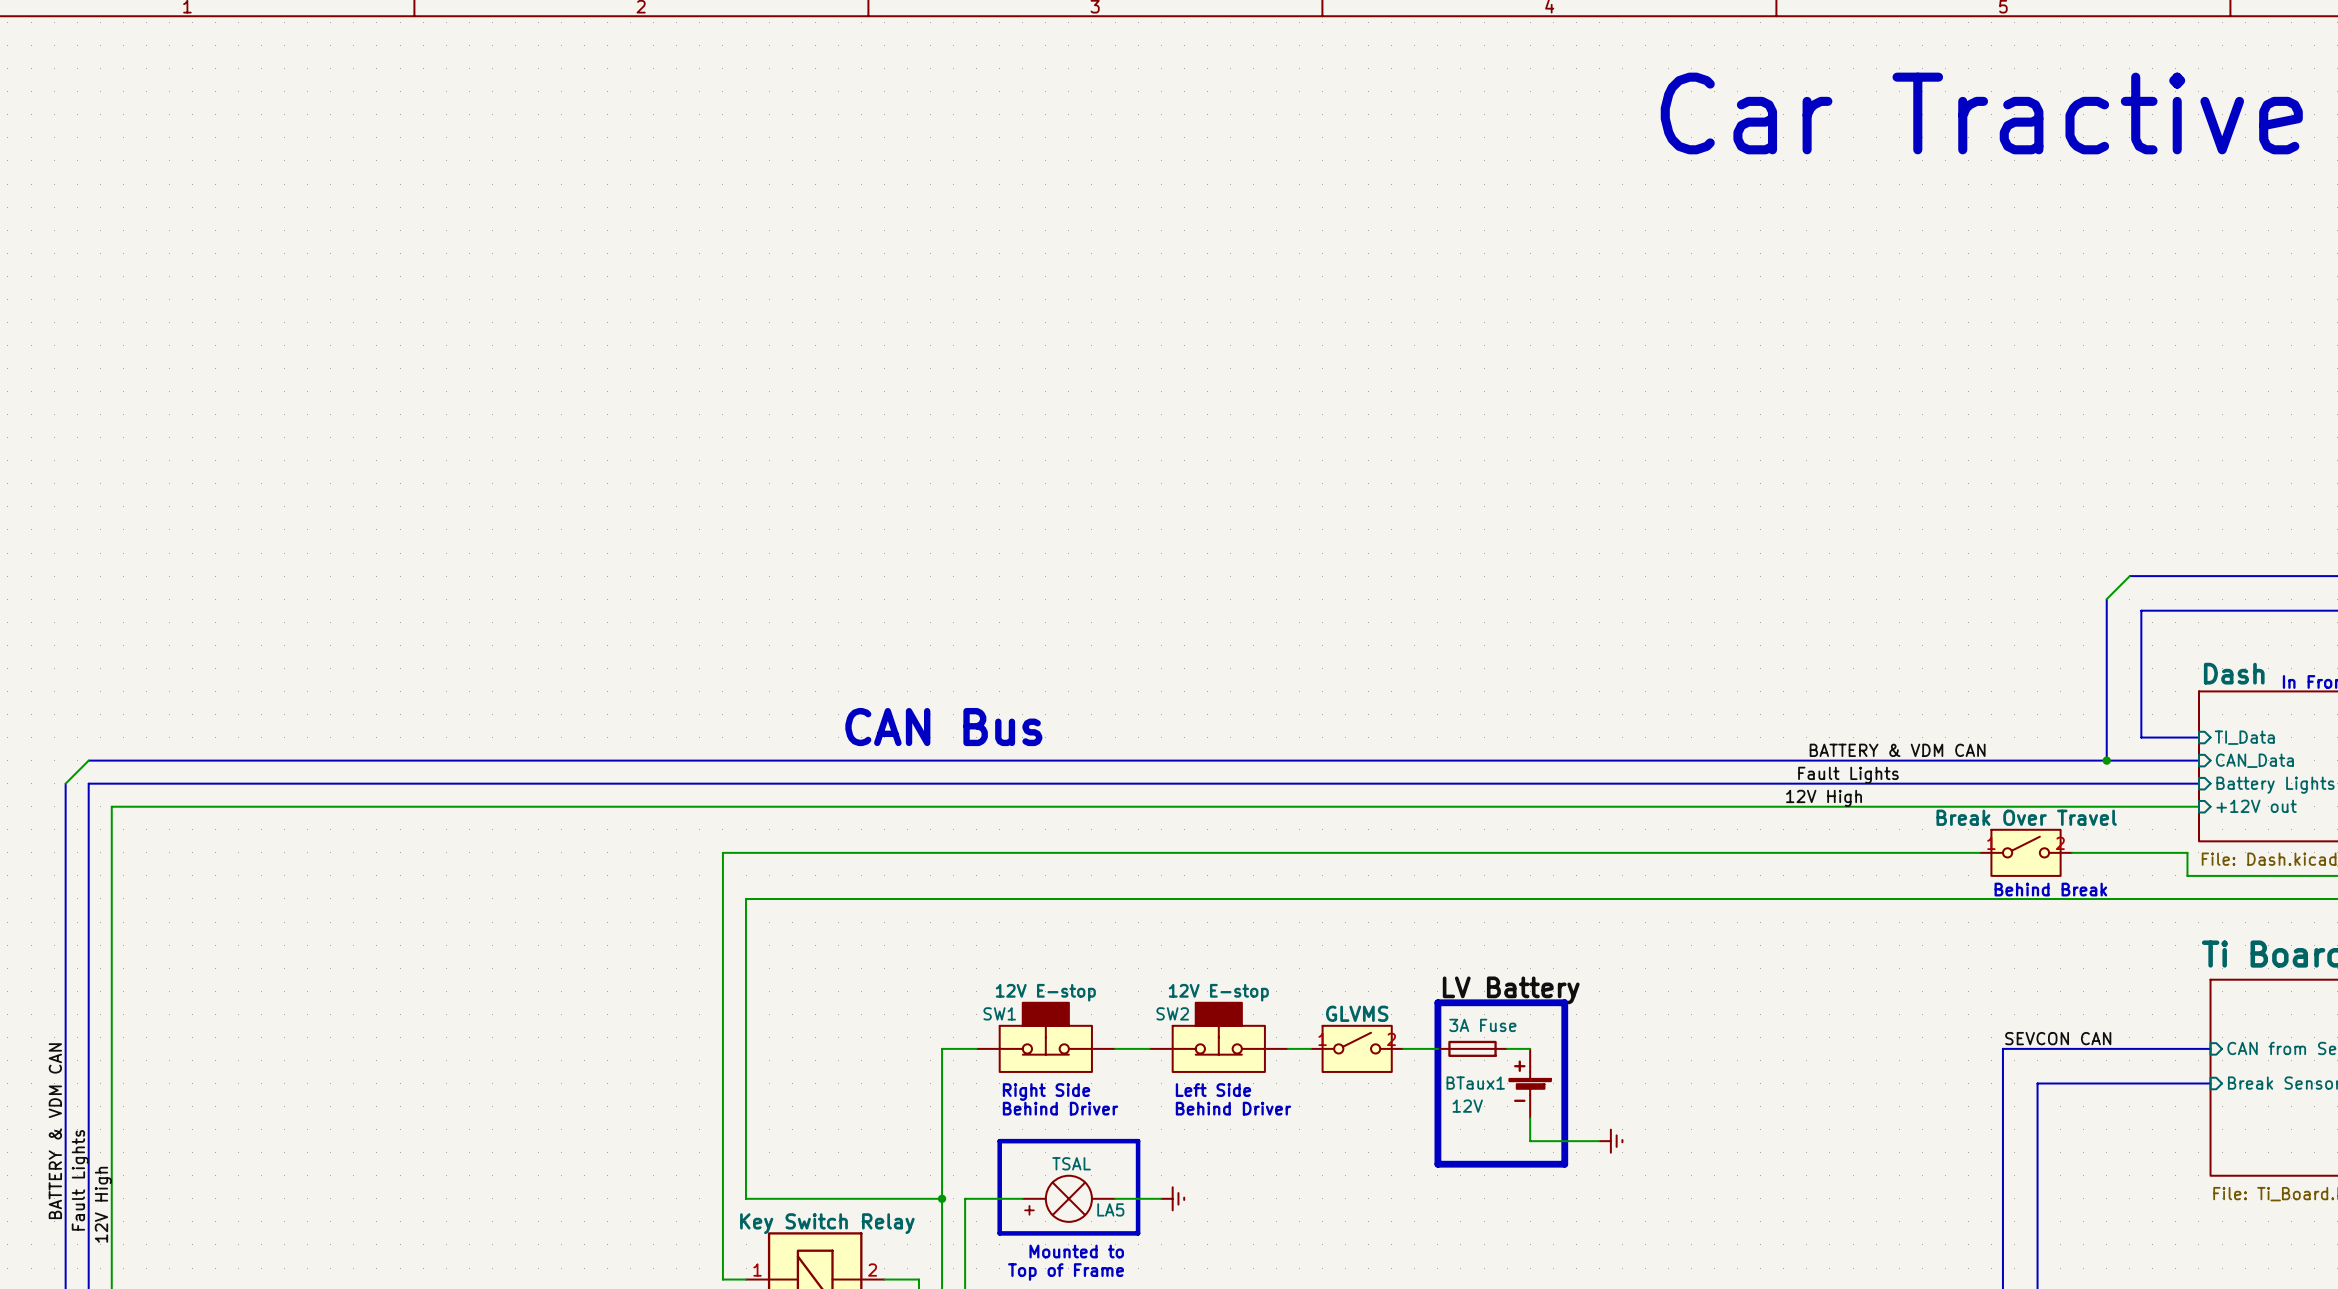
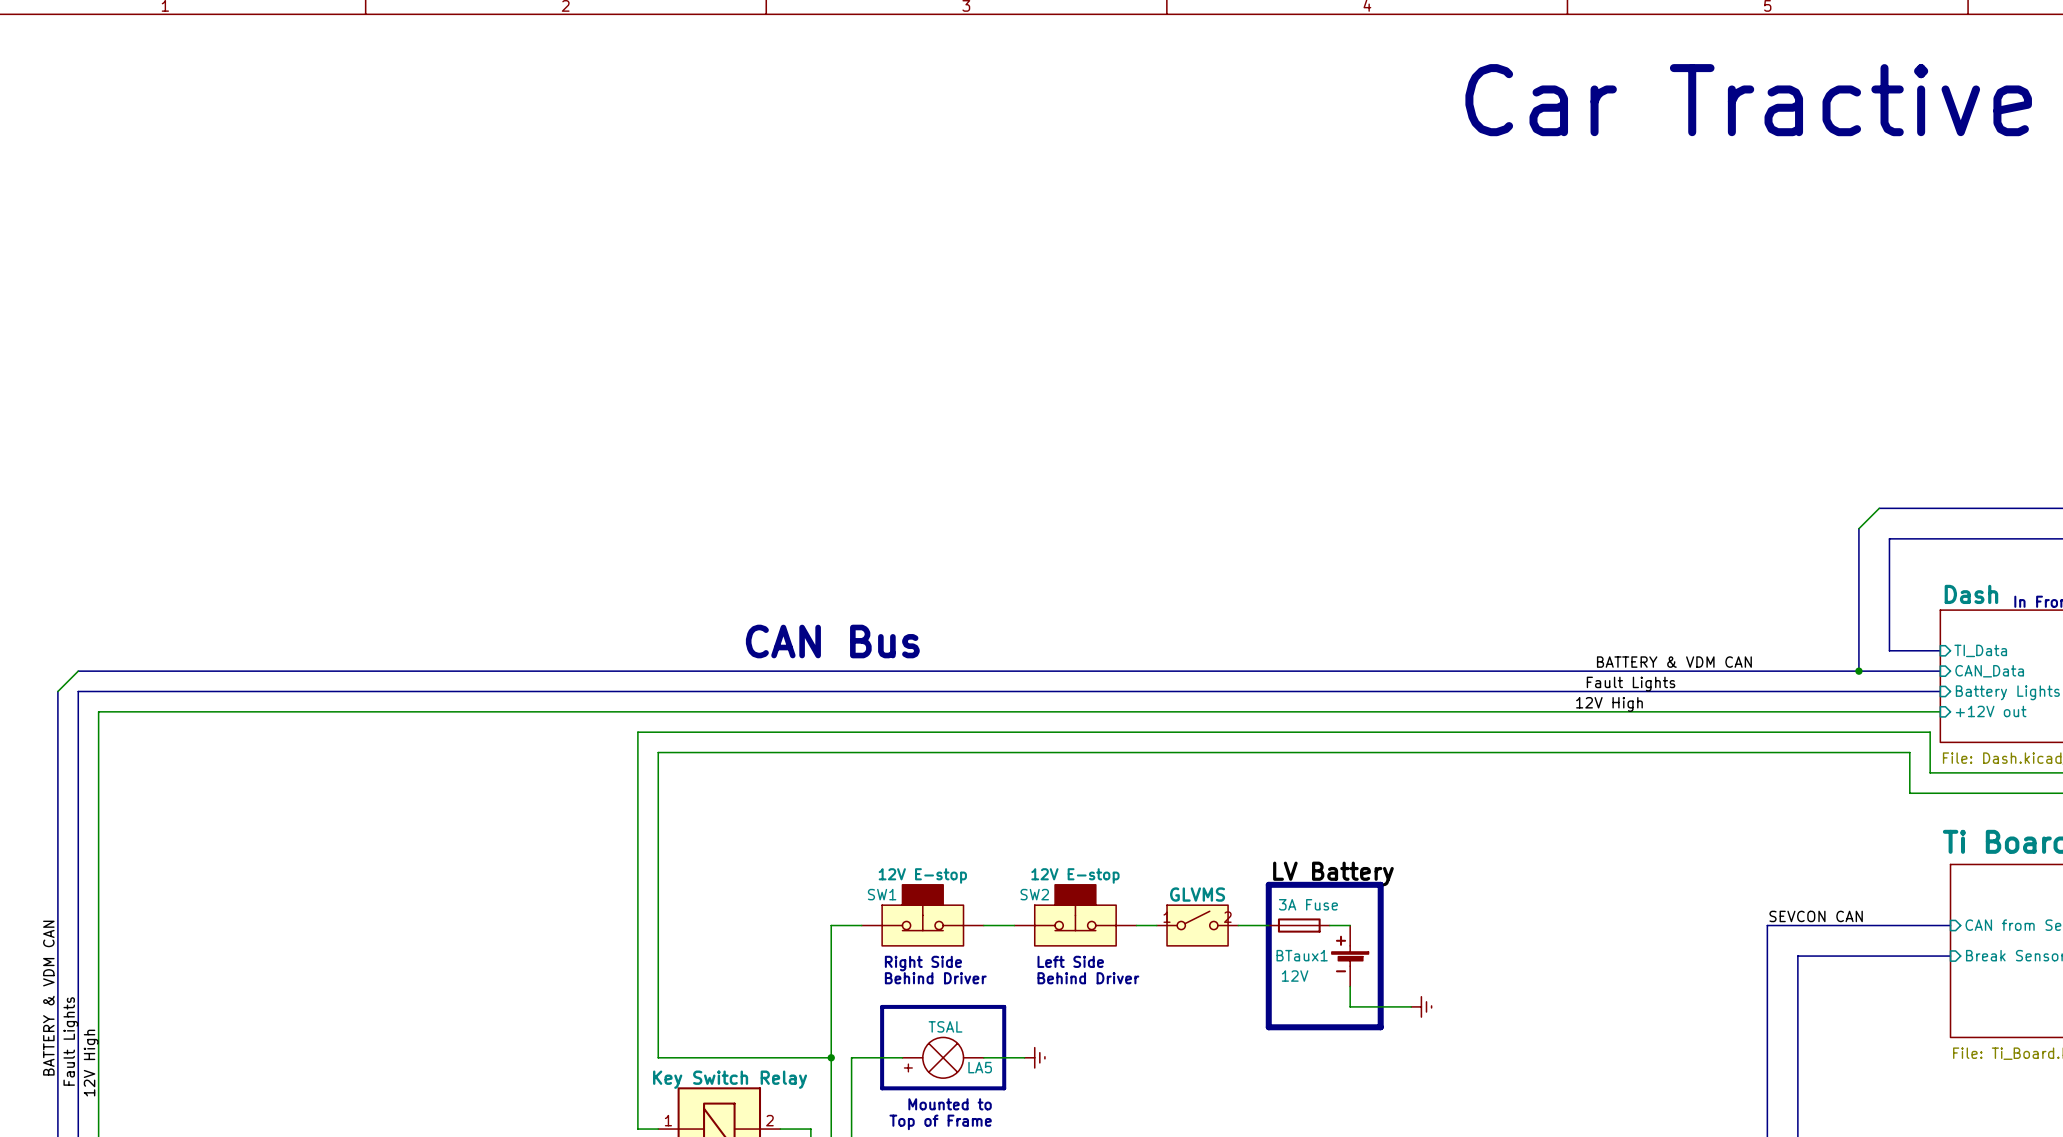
wire: (722, 852) (746, 852) -> (658, 793) (658, 752)
wire: none -> (637, 752) (637, 732) (1930, 732) (1930, 752)
part: Break Over Travel (2026, 852) -> none
wire: (2164, 852) (2187, 852) -> (1909, 752) (1909, 793)
text: Behind Break (2050, 889) -> none
wire: (746, 898) (2164, 898) -> none

